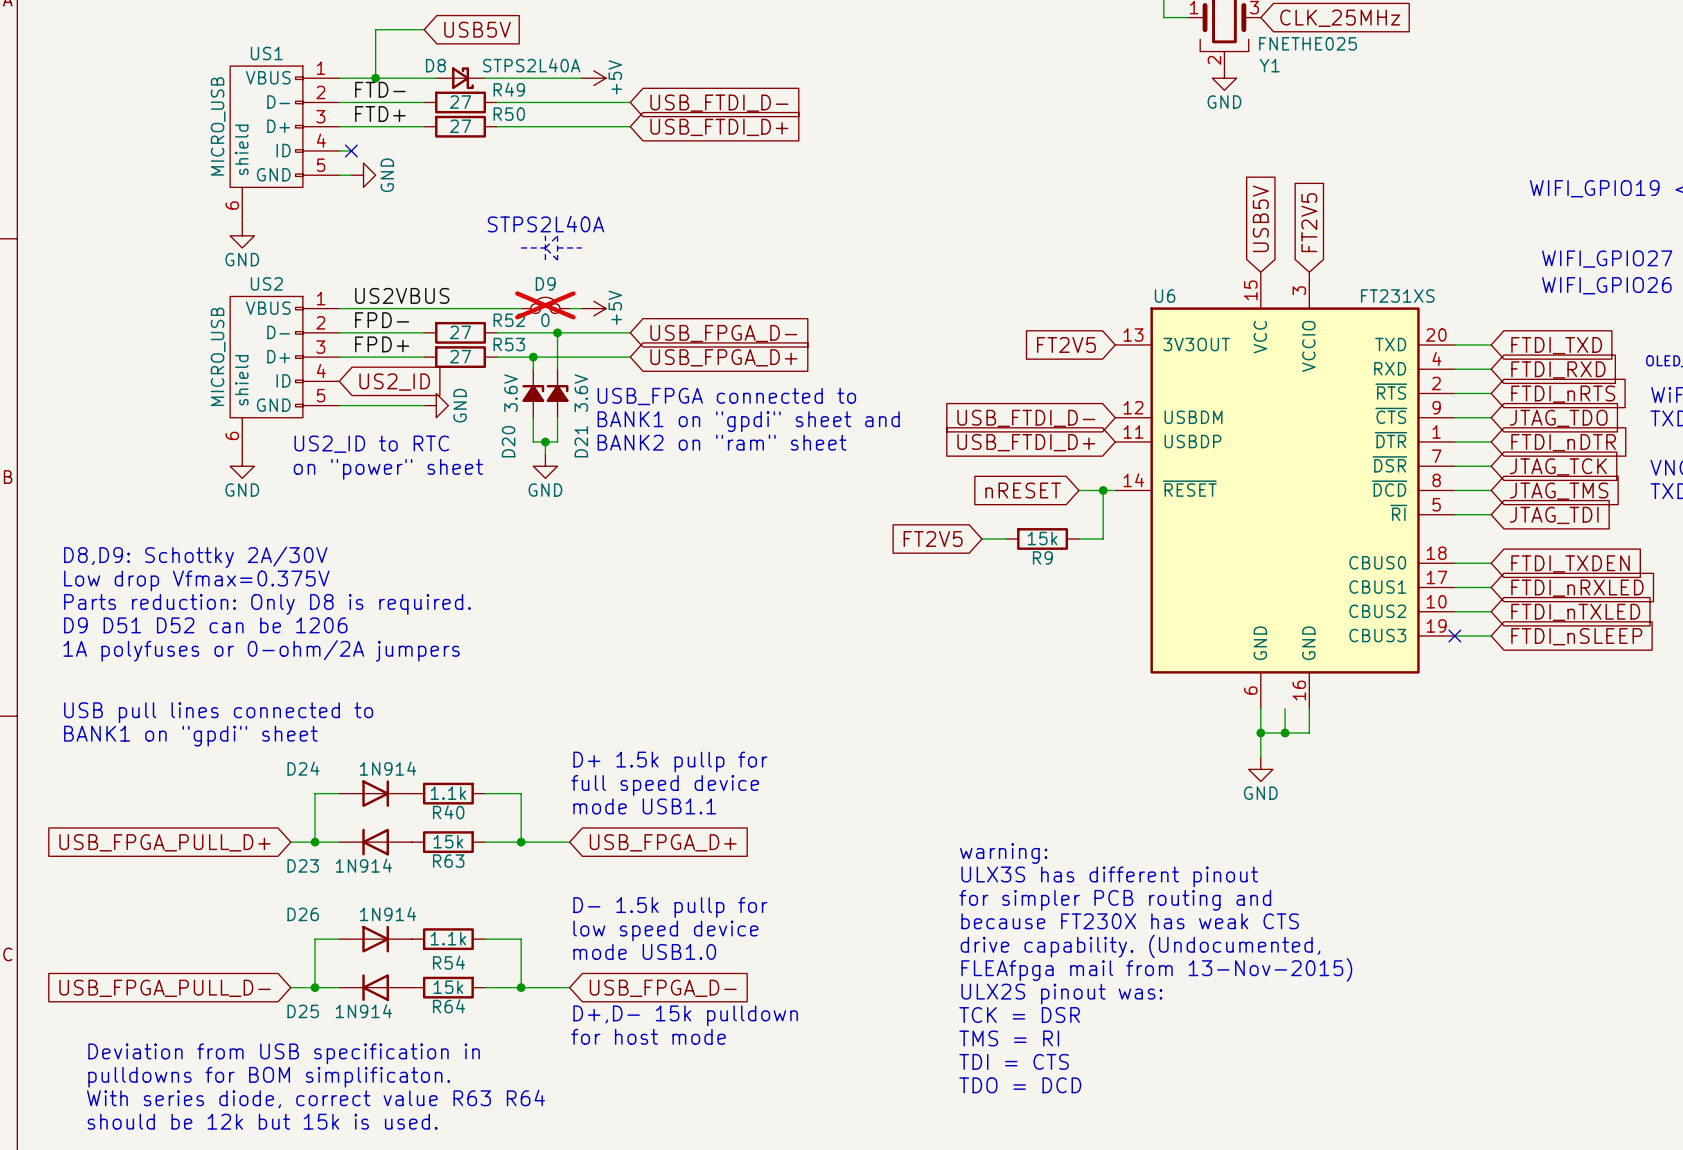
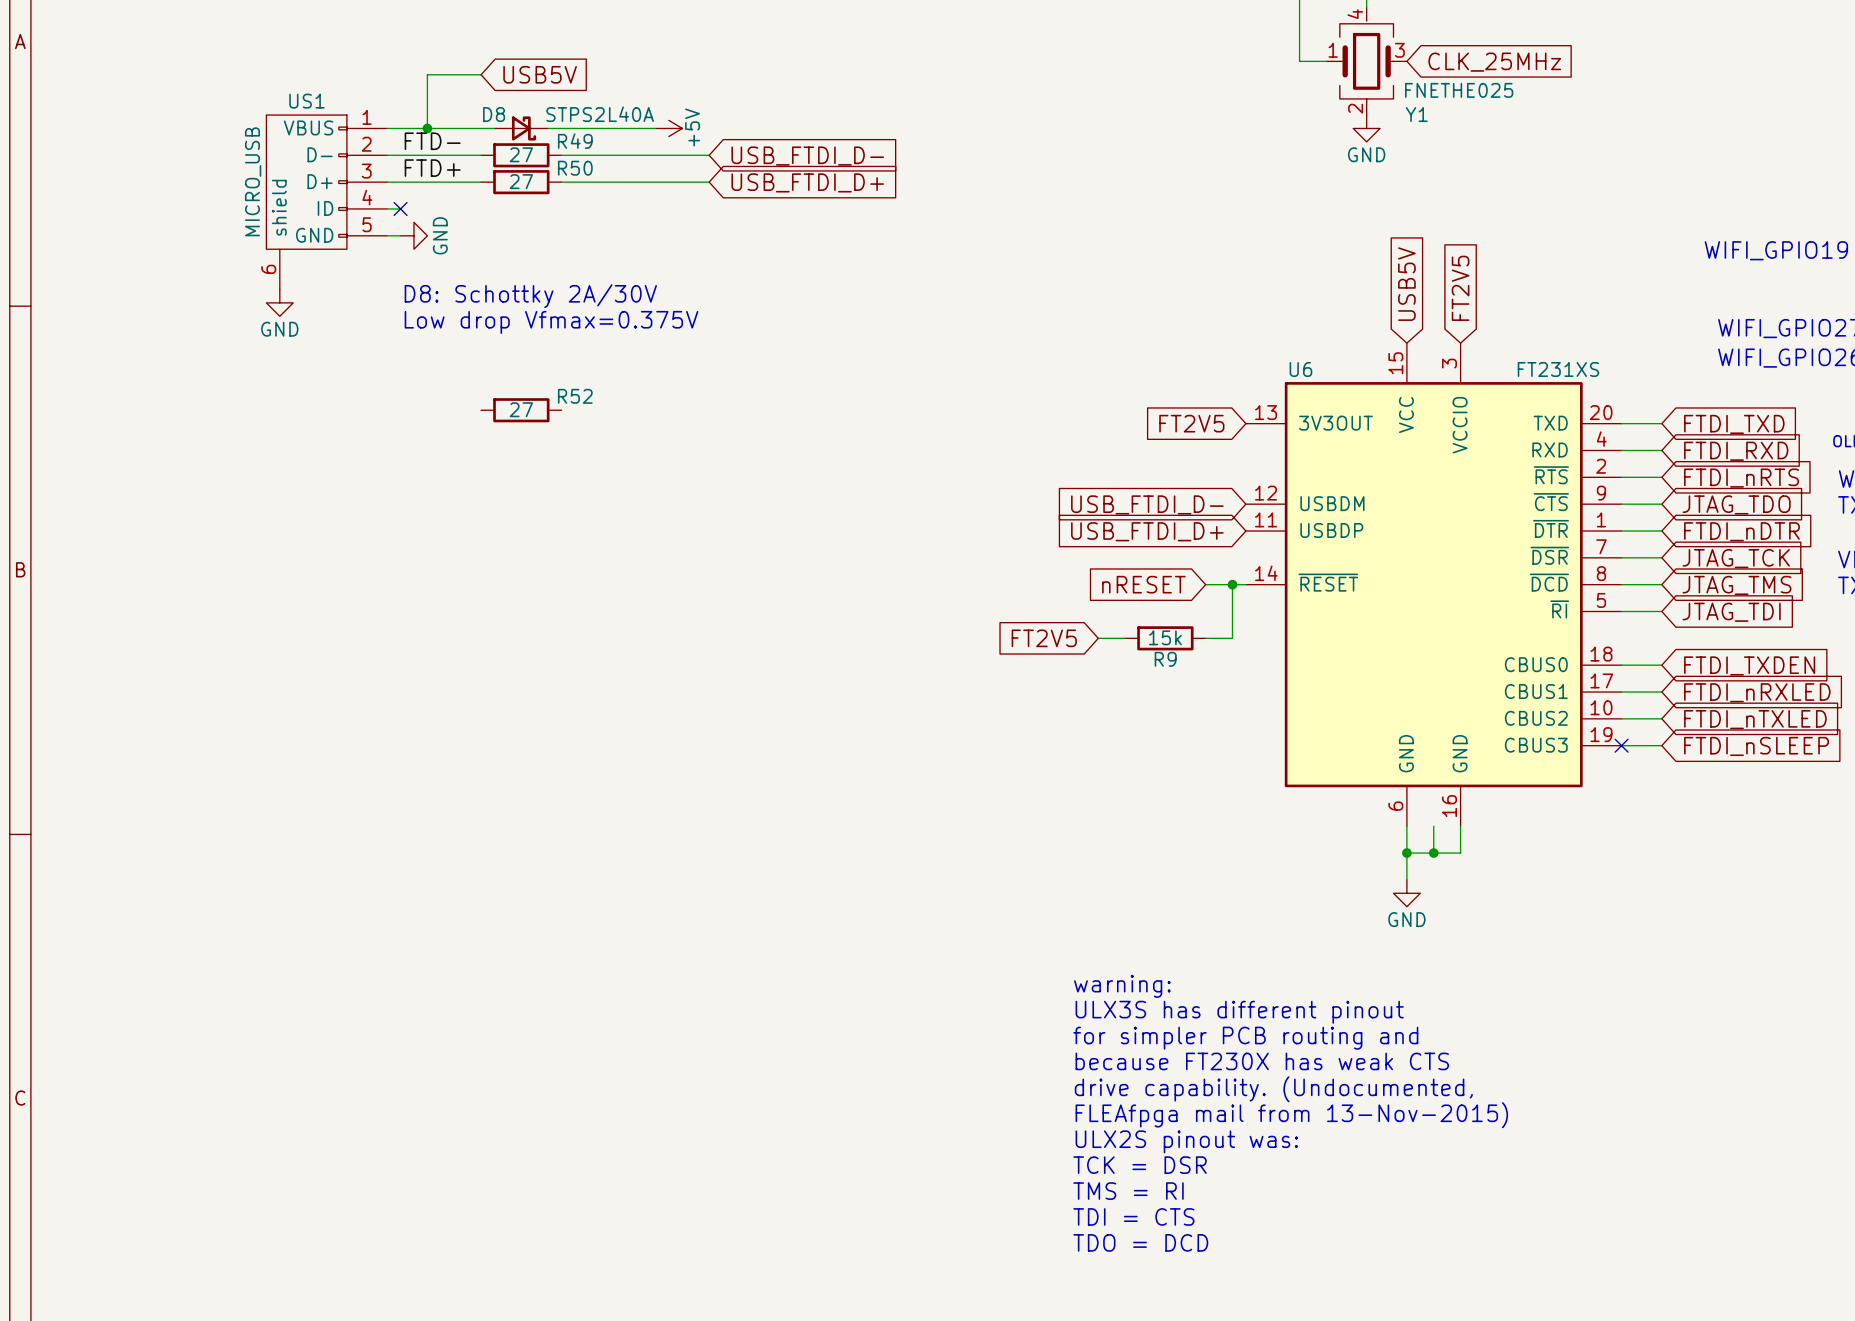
text: STPS2L40A (546, 224) -> none
text: none -> D8: Schottky 2A/30V (530, 296)
line: (545, 235) (545, 260) -> none
line: (521, 247) (545, 247) -> none
line: (545, 247) (557, 260) (557, 235) (545, 247) -> none
line: (557, 247) (581, 247) -> none
text: none -> Low drop Vfmax=0.375V (551, 322)
label: US2VBUS (402, 295) -> none
D9: 0 (545, 305) -> none
wire: (339, 308) (521, 308) -> none
wire: (569, 308) (581, 308) -> none
power symbol: +5V (593, 308) -> none
label: FPD- (382, 320) -> none
wire: (339, 332) (424, 332) -> none
wire: (496, 332) (630, 332) -> none
wire: (557, 332) (557, 369) -> none
junction: (557, 332) -> none
global label: USB_FPGA_D- (723, 333) -> none
label: FPD+ (382, 344) -> none
wire: (339, 357) (424, 357) -> none
R53: 27 (460, 357) -> none
wire: (496, 357) (630, 357) -> none
wire: (533, 357) (533, 369) -> none
junction: (533, 357) -> none
global label: USB_FPGA_D+ (723, 357) -> none
US2: MICRO_USB (284, 375) -> none
global label: US2_ID (394, 382) -> none
D20: 3.6V (533, 393) -> none
D21: 3.6V (557, 393) -> none
text: USB_FPGA connected to (726, 396) -> none
wire: (339, 405) (424, 405) -> none
power symbol: GND (436, 405) -> none
wire: (533, 417) (533, 441) (557, 441) (557, 417) -> none
text: BANK1 on "gpdi" sheet and (748, 421) -> none
wire: (545, 441) (545, 454) -> none
junction: (545, 441) -> none
text: BANK2 on "ram" sheet (722, 442) -> none
text: US2_ID to RTC (371, 444) -> none
power symbol: GND (242, 466) -> none
power symbol: GND (545, 466) -> none
text: on "power" sheet (388, 469) -> none
text: D8,D9: Schottky 2A/30V (195, 557) -> none
text: Low drop Vfmax=0.375V (196, 580) -> none
text: Parts reduction: Only D8 is required. (267, 604) -> none
text: D9 D51 D52 can be 1206 (205, 625) -> none
text: 1A polyfuses or 0-ohm/2A jumpers (261, 650) -> none
text: USB pull lines connected to (218, 712) -> none
text: BANK1 on "gpdi" sheet (190, 736) -> none
text: D+ 1.5k pullp for (670, 762) -> none
text: full speed device (665, 785) -> none
wire: (339, 793) (315, 793) (315, 842) -> none
D24: 1N914 (375, 793) -> none
R40: 1.1k (448, 793) -> none
wire: (484, 793) (521, 793) (521, 842) -> none
text: mode USB1.1 (644, 806) -> none
global label: USB_FPGA_PULL_D+ (165, 842) -> none
wire: (290, 842) (339, 842) -> none
junction: (315, 842) -> none
D23: 1N914 (375, 842) -> none
R63: 15k (448, 842) -> none
wire: (484, 842) (569, 842) -> none
junction: (521, 842) -> none
global label: USB_FPGA_D+ (663, 842) -> none
text: D- 1.5k pullp for (670, 907) -> none
text: low speed device (665, 930) -> none
wire: (339, 939) (315, 939) (315, 987) -> none
D26: 1N914 (375, 939) -> none
R54: 1.1k (448, 939) -> none
wire: (484, 939) (521, 939) (521, 987) -> none
text: mode USB1.0 (644, 951) -> none
wire: (290, 987) (339, 987) -> none
junction: (315, 987) -> none
D25: 1N914 (375, 987) -> none
R64: 15k (448, 987) -> none
wire: (484, 987) (569, 987) -> none
junction: (521, 987) -> none
global label: USB_FPGA_PULL_D- (165, 988) -> none
global label: USB_FPGA_D- (663, 988) -> none
text: D+,D- 15k pulldown (685, 1015) -> none
text: for host mode (648, 1036) -> none
text: Deviation from USB specification in (284, 1053) -> none
text: pulldowns for BOM simplificaton. (269, 1077) -> none
text: With series diode, correct value R63 R64 (315, 1098) -> none
text: should be 12k but 15k is used. (262, 1121) -> none

